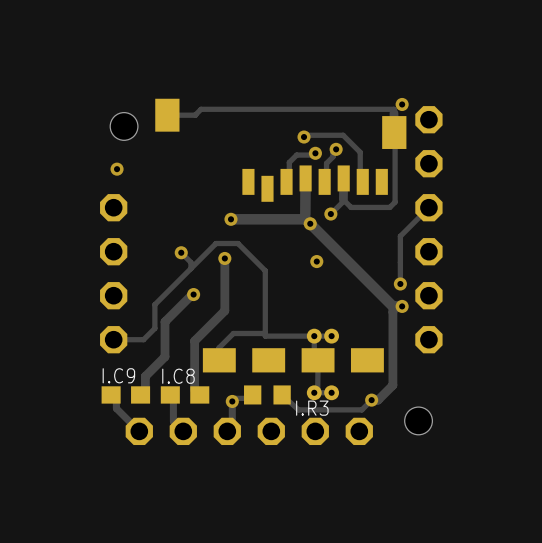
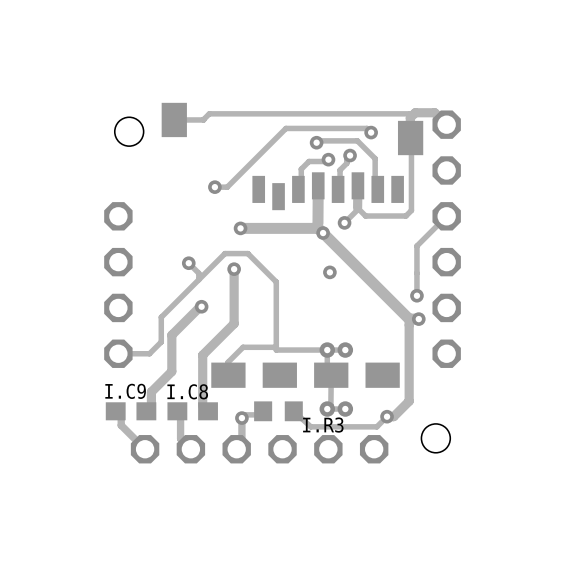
via position: (402, 104) -> (371, 132)
track: none -> (410, 117) (415, 112) (434, 112) (446, 124)
track: none -> (371, 132) (367, 128) (285, 128) (227, 187) (214, 187)
via position: (117, 169) -> (214, 187)

